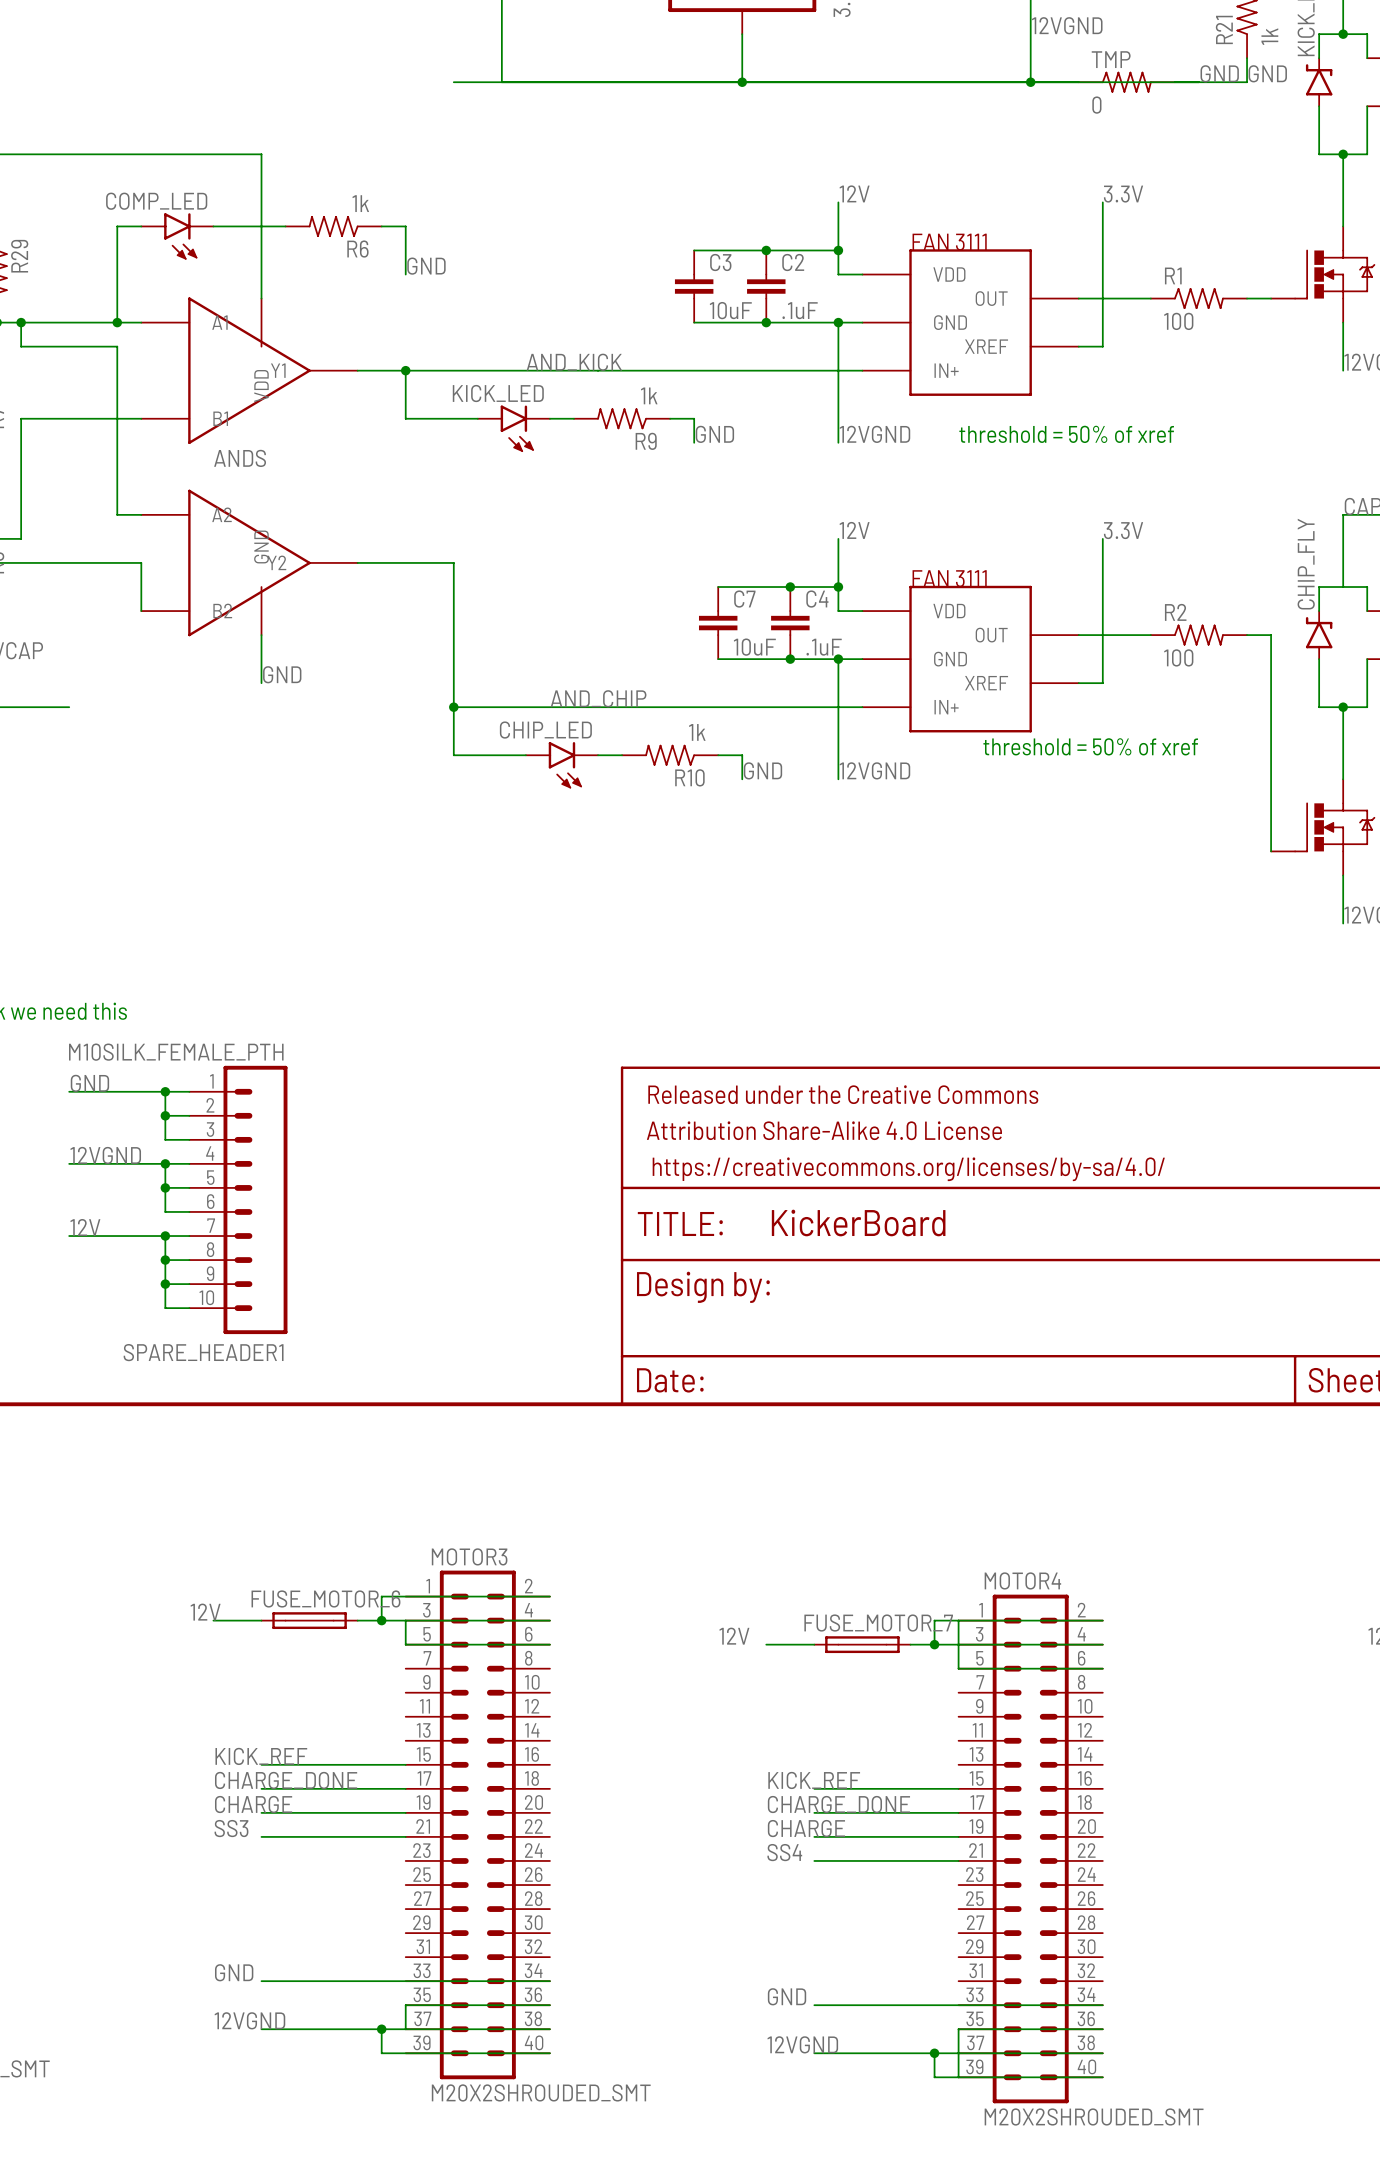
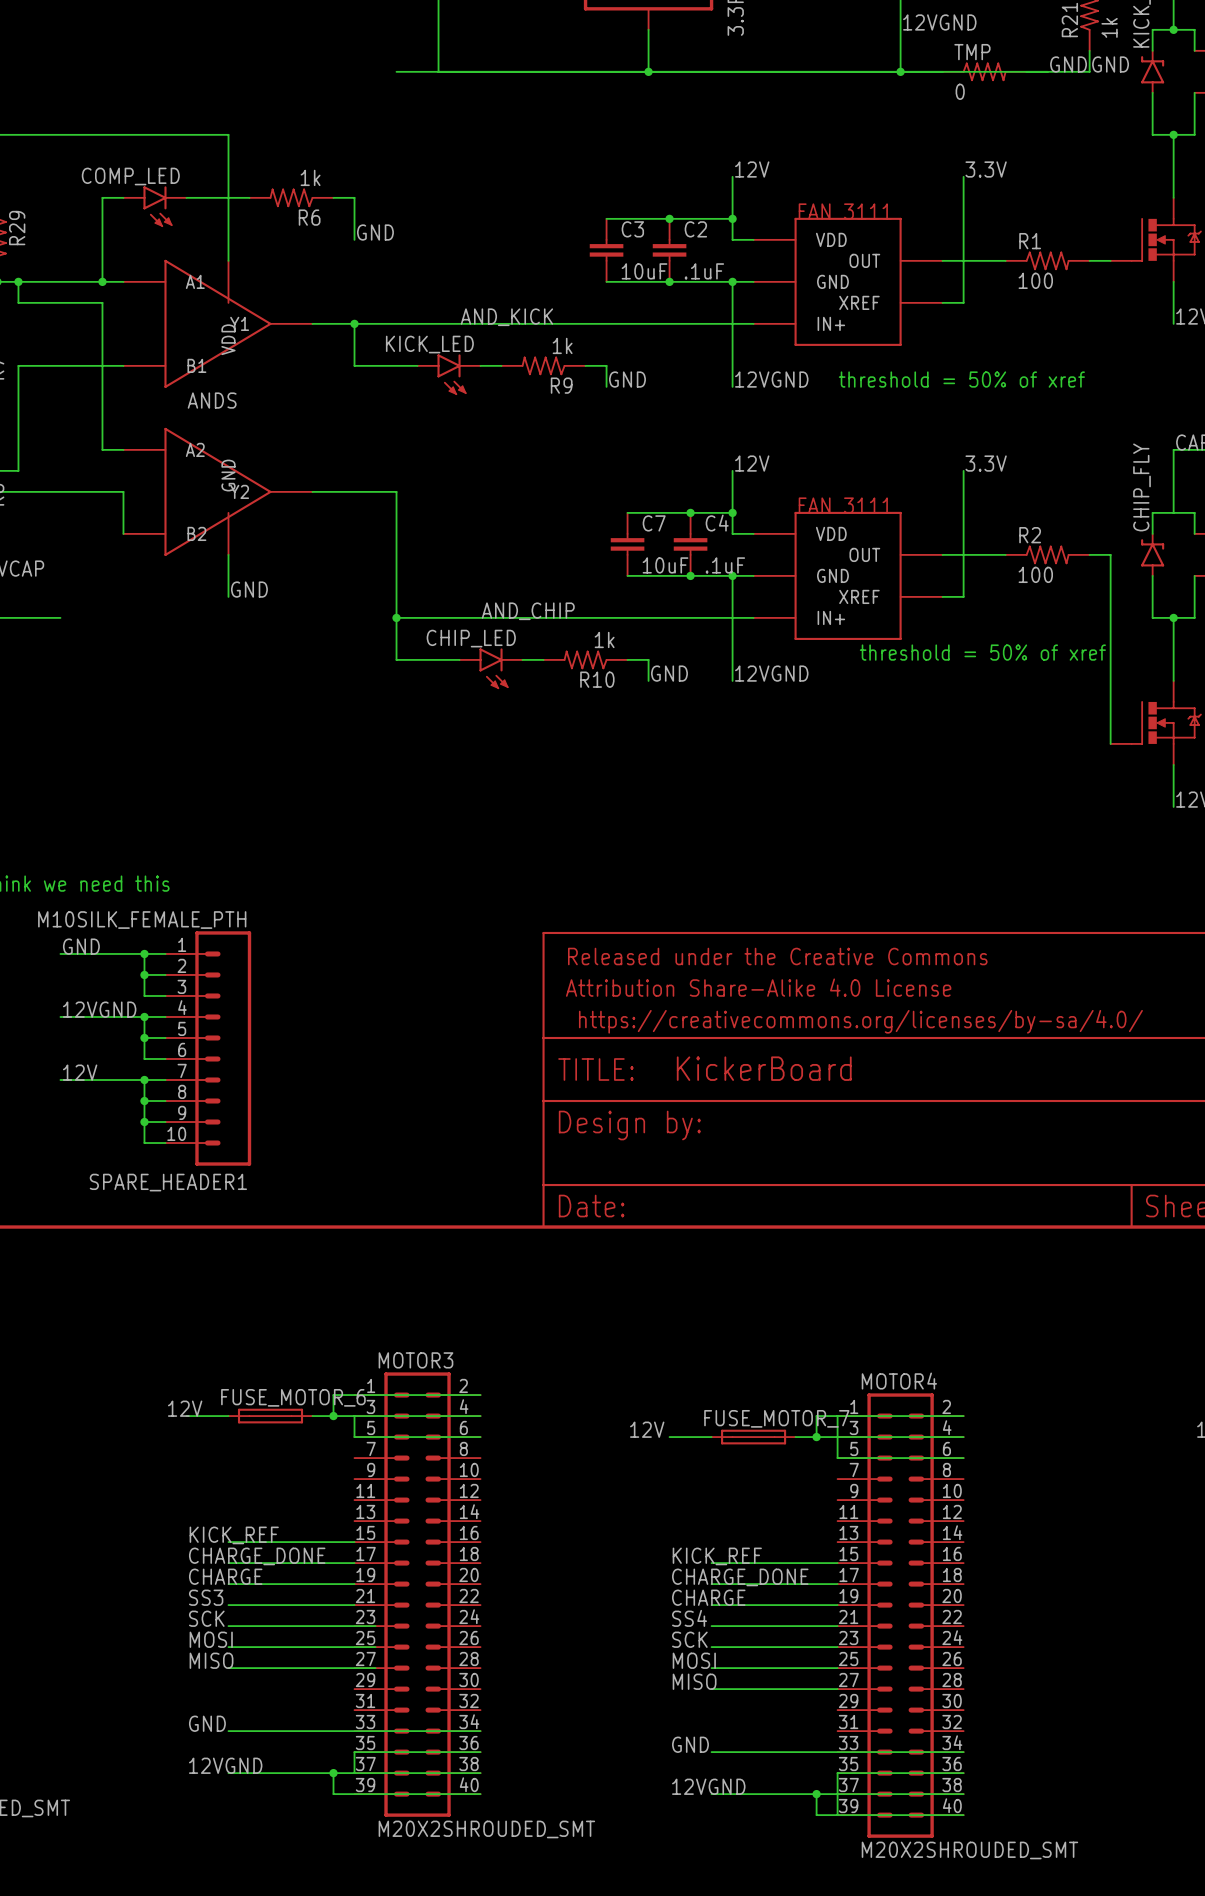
label: none -> SCK (206, 1618)
wire: none -> (228, 1626) (375, 1626)
label: none -> MOSI (211, 1639)
label: none -> SCK (689, 1639)
wire: none -> (228, 1647) (375, 1647)
wire: none -> (711, 1647) (837, 1647)
label: none -> MISO (211, 1660)
label: none -> MOSI (694, 1660)
wire: none -> (228, 1668) (375, 1668)
wire: none -> (711, 1668) (837, 1668)
label: none -> MISO (694, 1681)
wire: none -> (711, 1689) (837, 1689)

